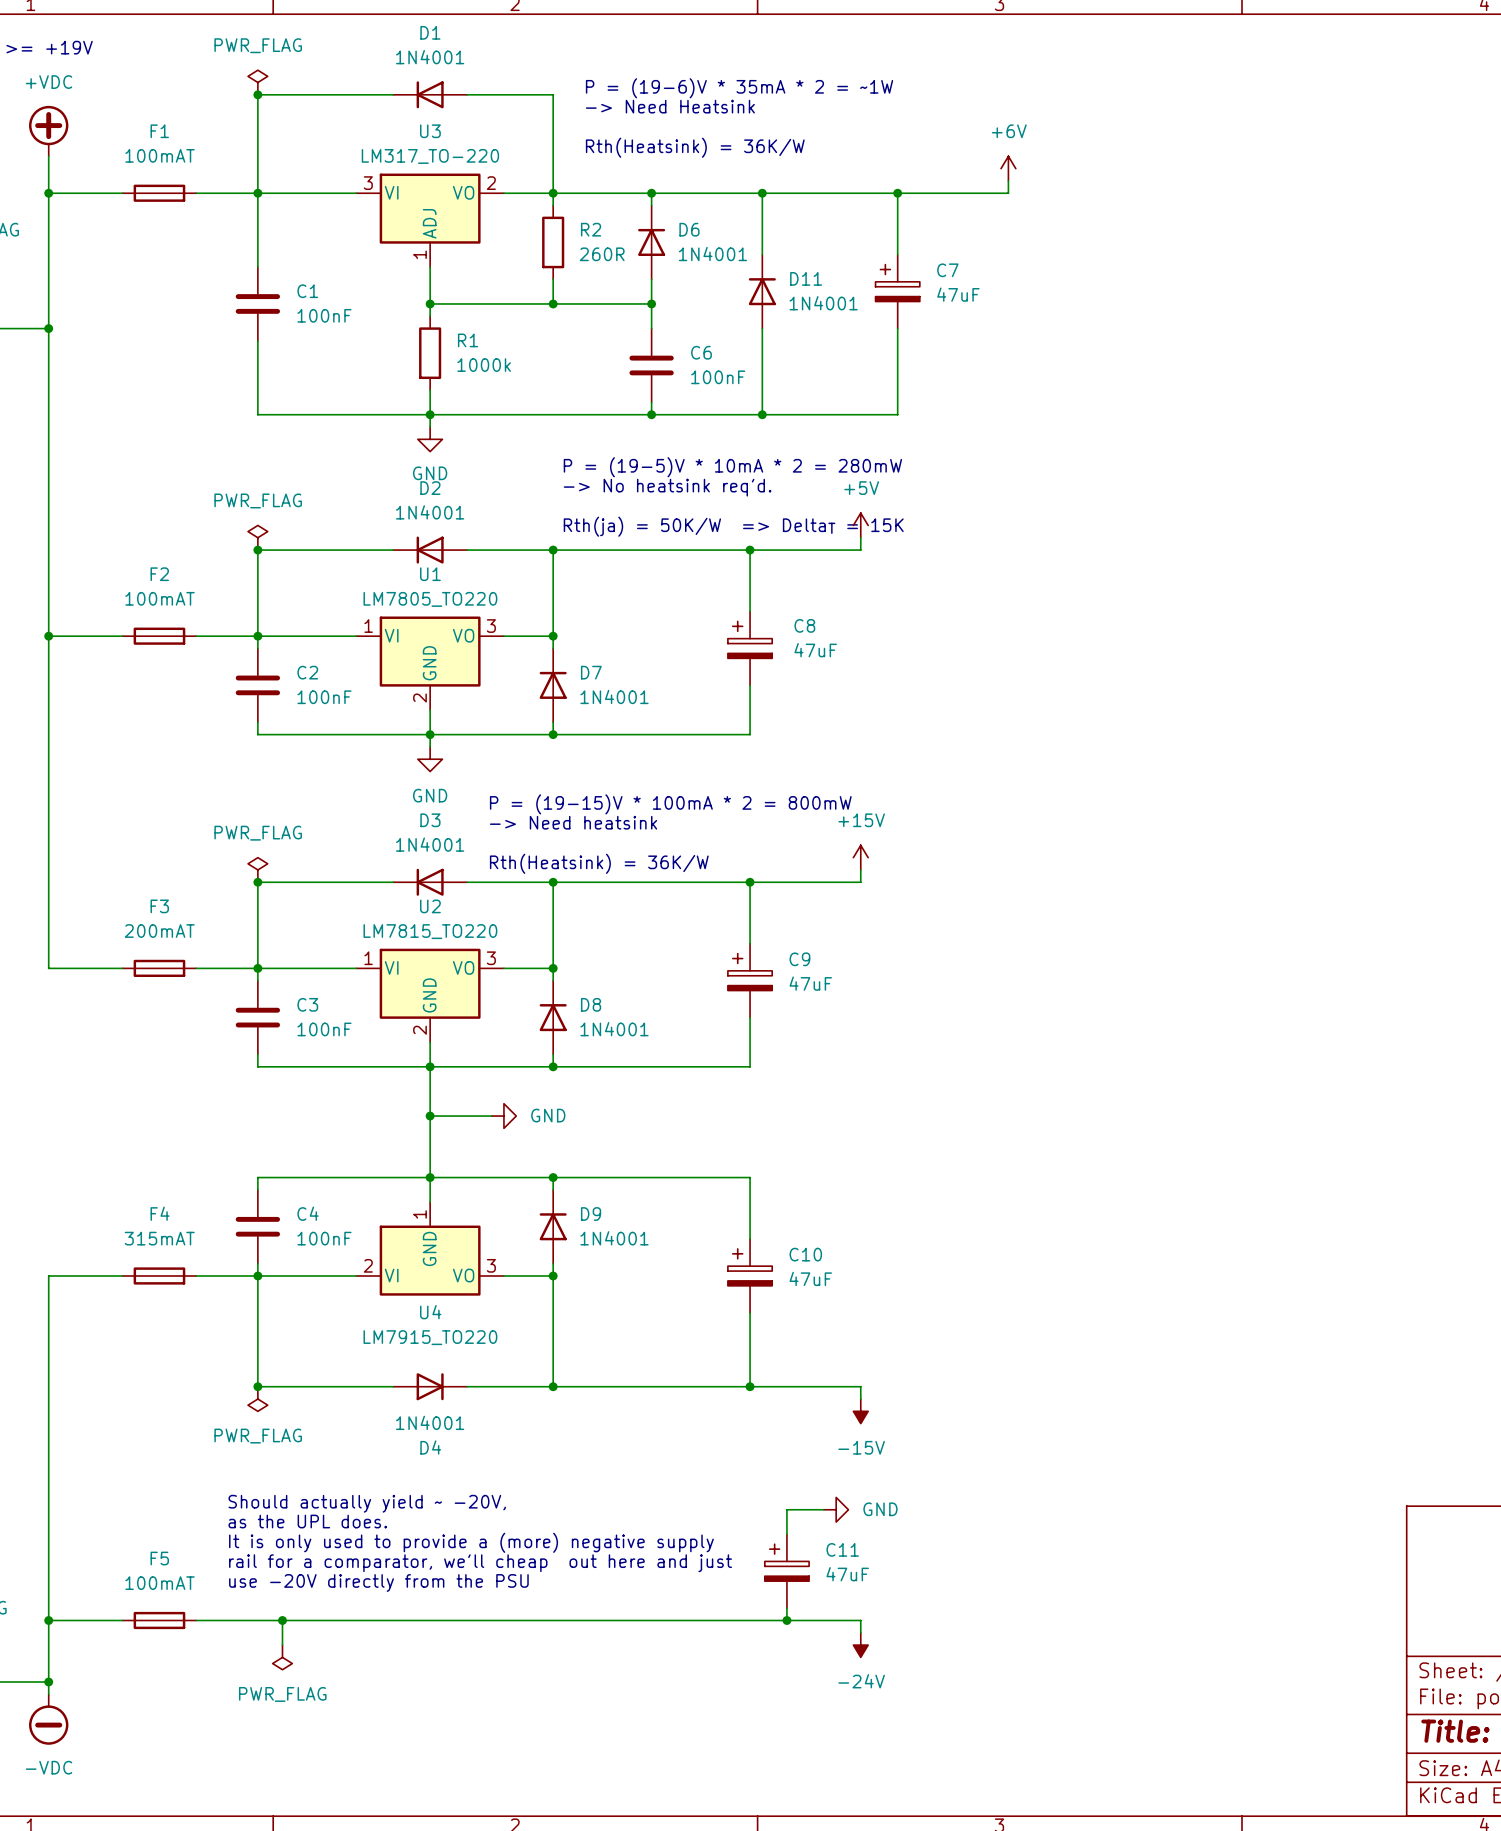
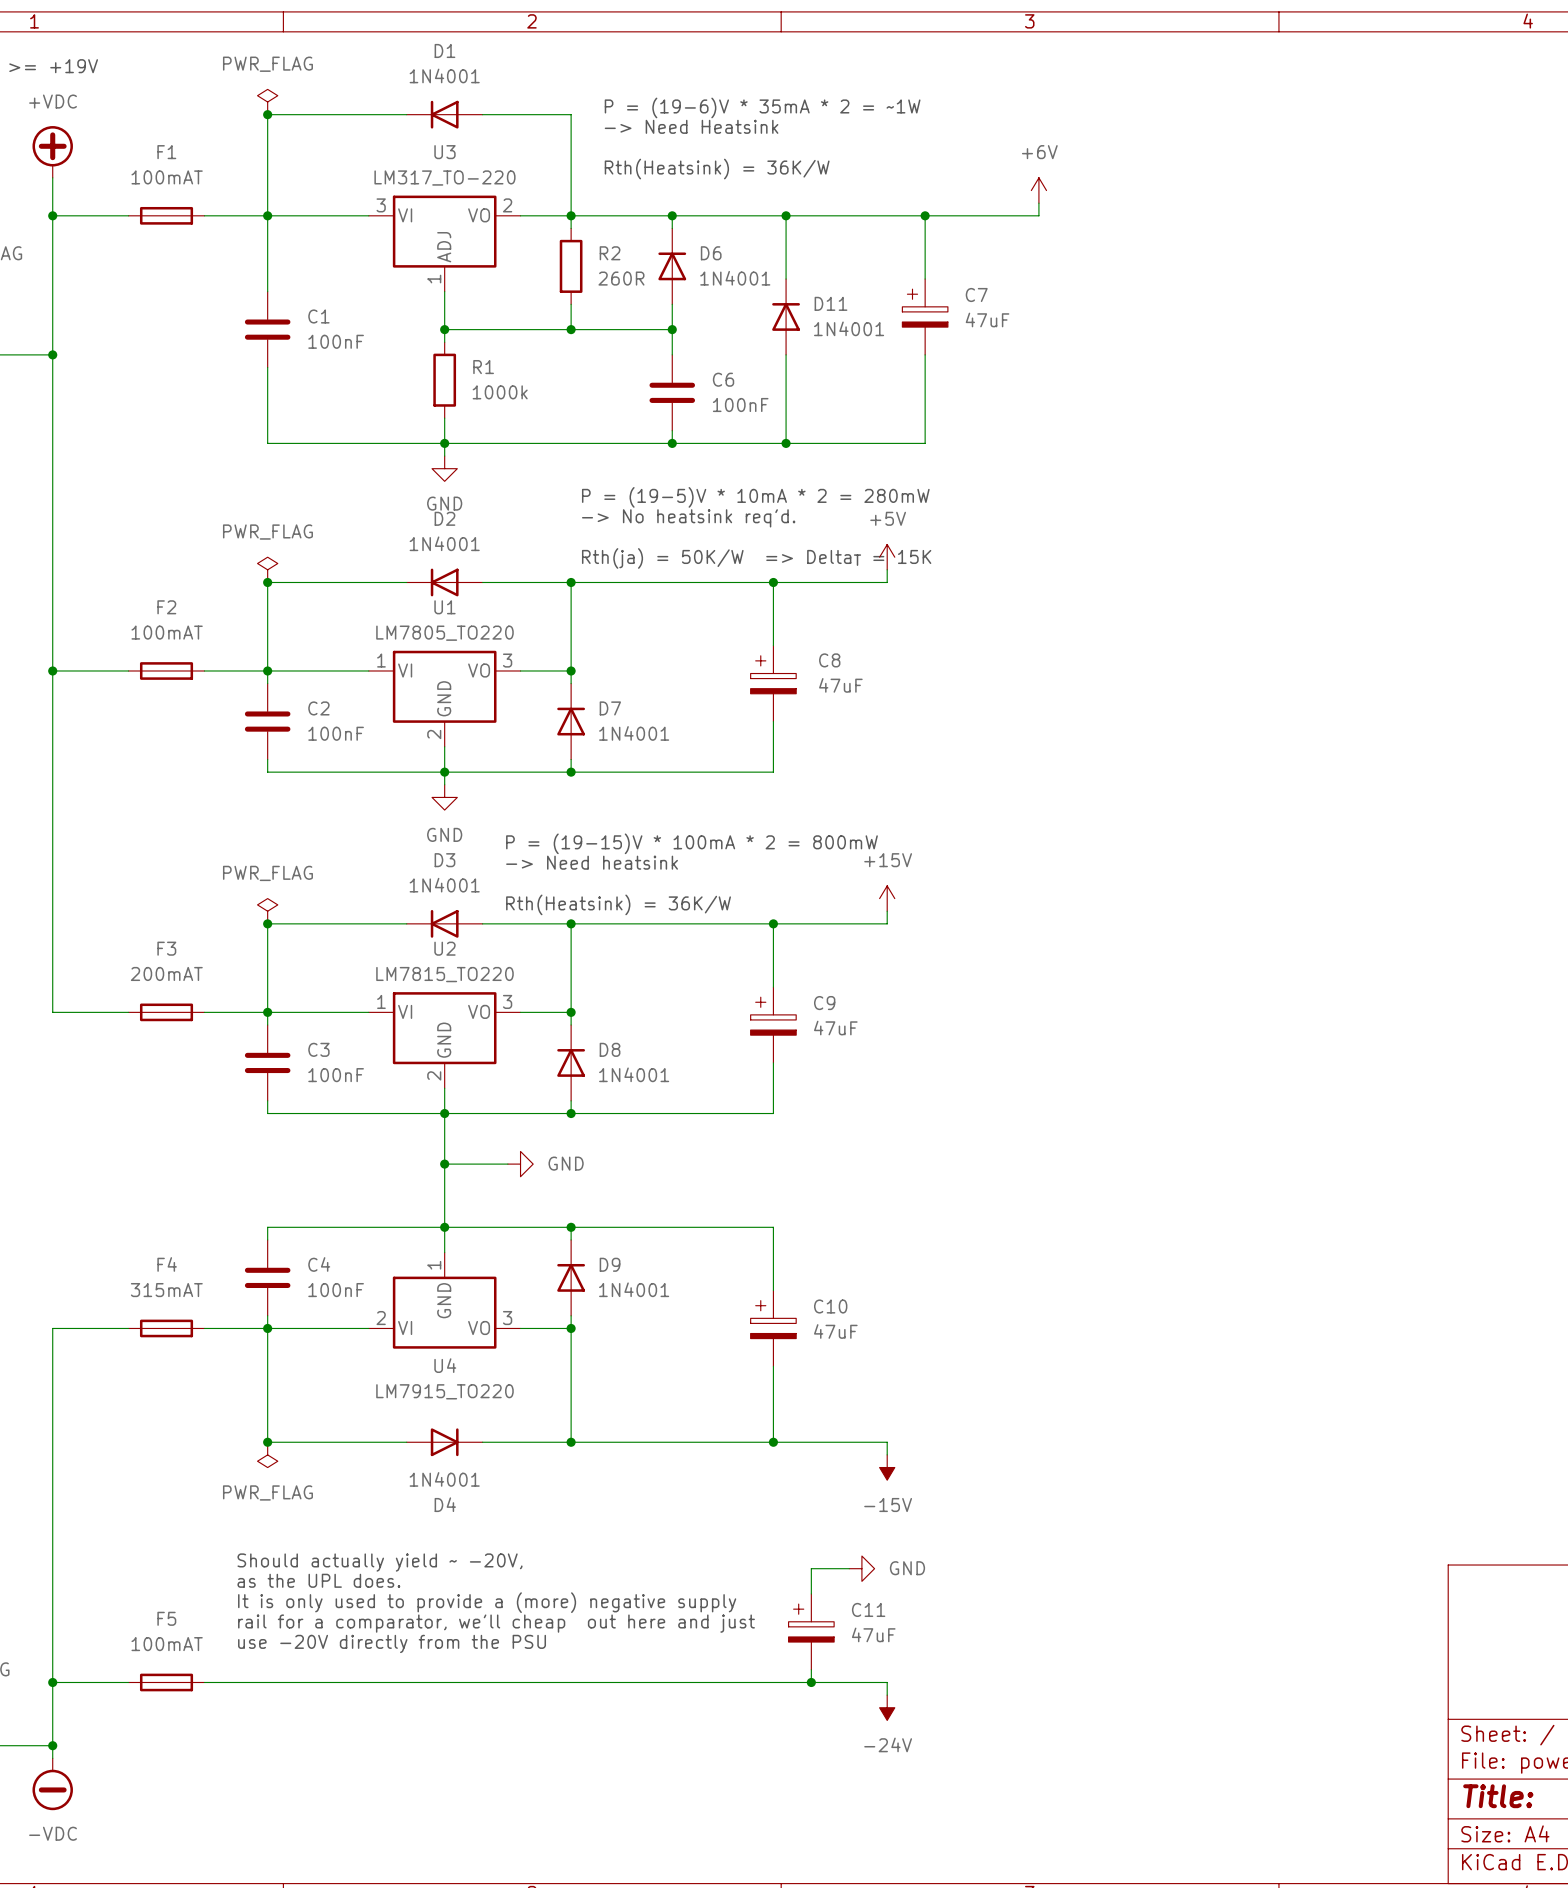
wire: (282, 1620) (282, 1645) -> none
junction: (282, 1620) -> none
power symbol: PWR_FLAG (282, 1657) -> none

